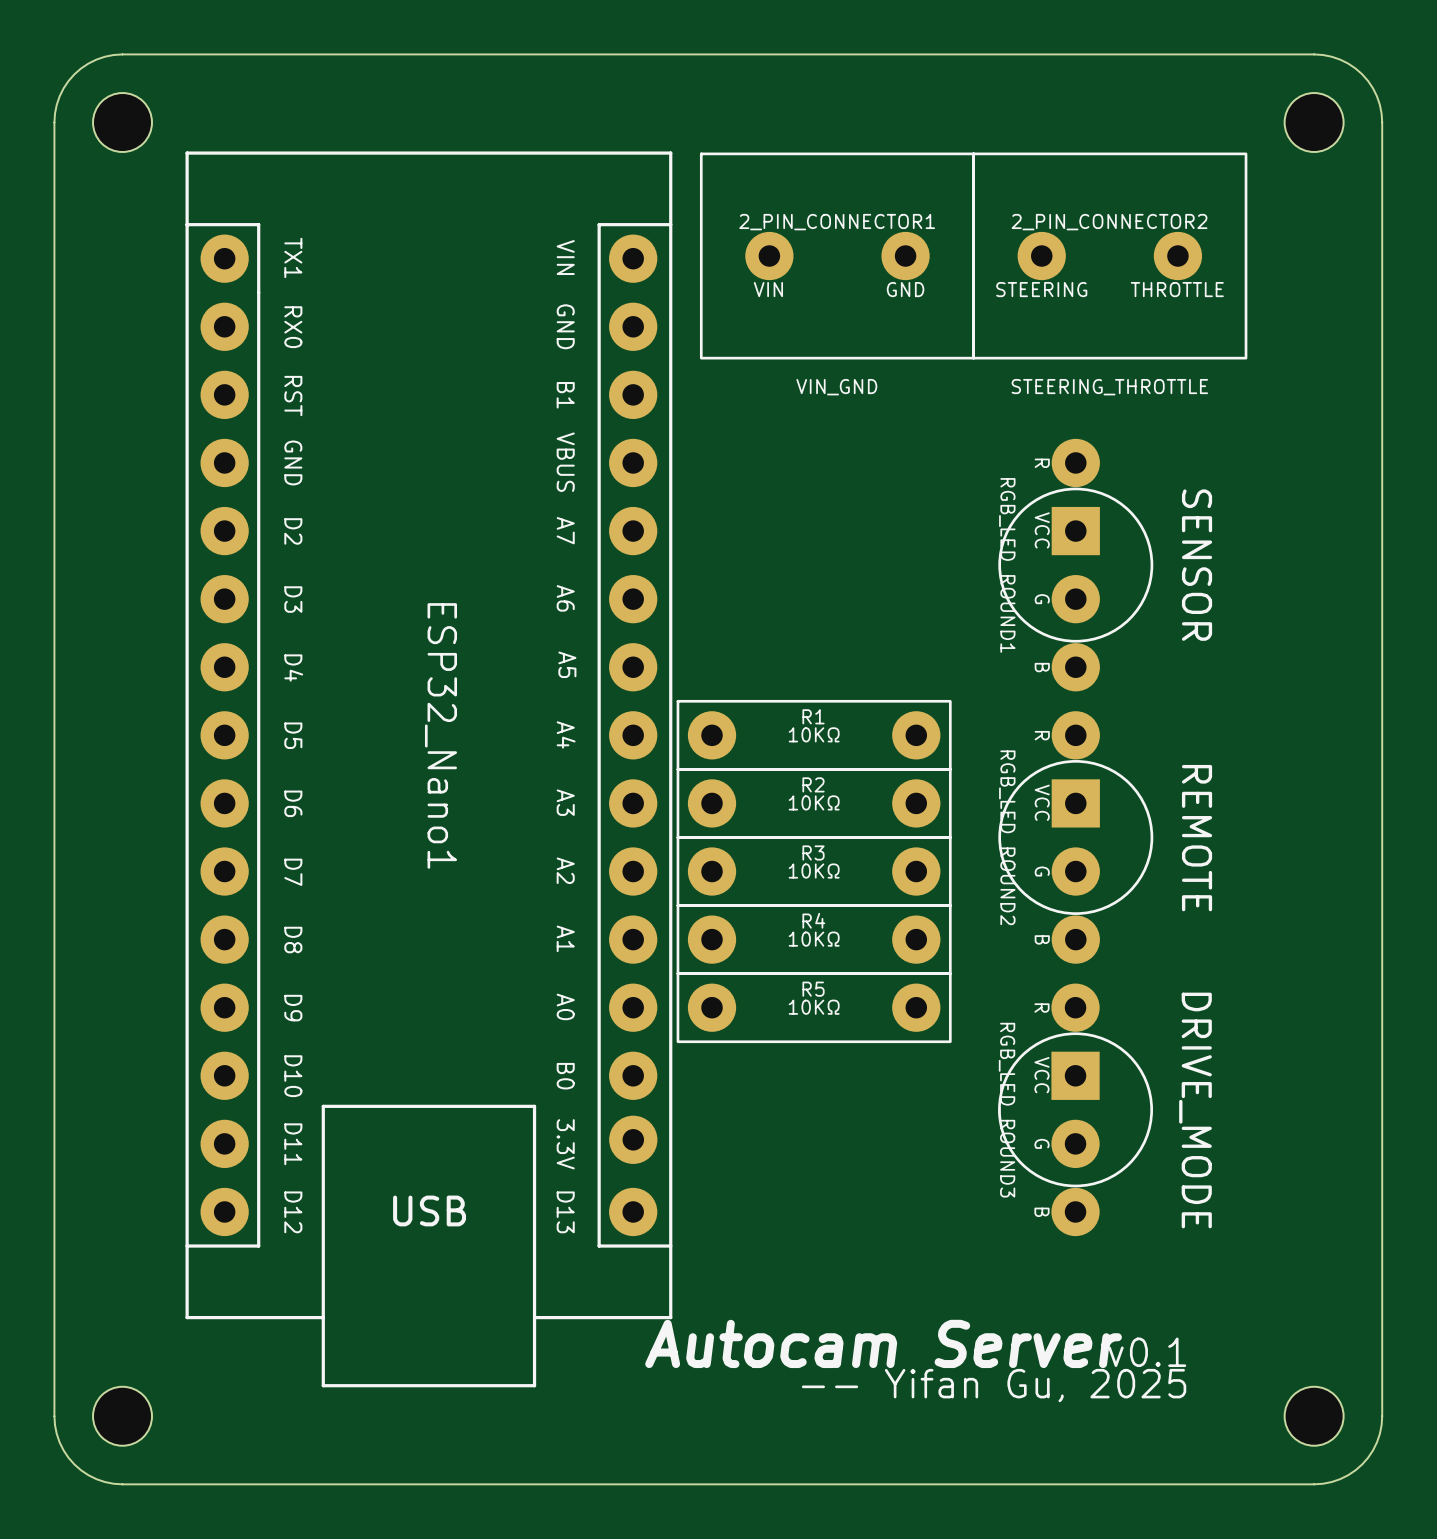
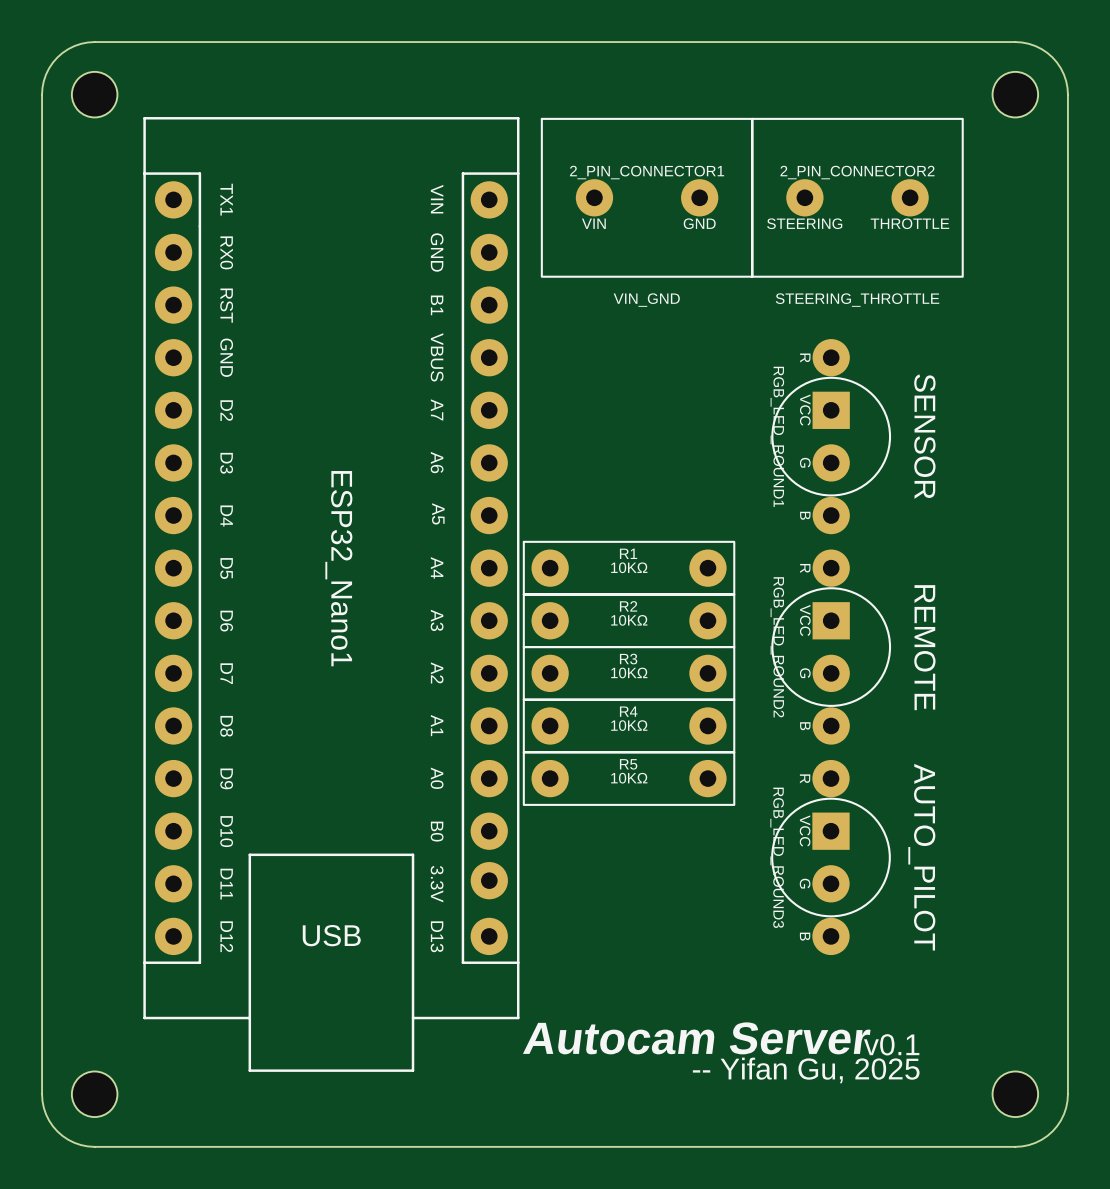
RGB_LED_ROUND3 value: DRIVE_MODE (1195, 1110) -> AUTO_PILOT (921, 857)

